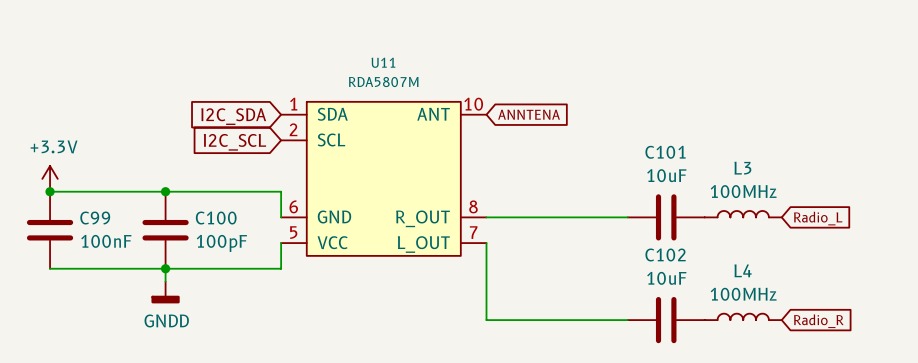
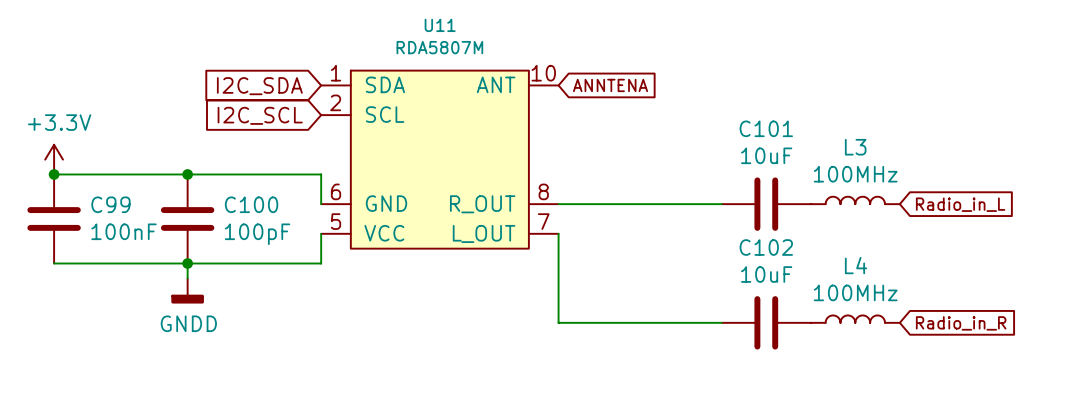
global label: Radio_L (818, 218) -> Radio_in_L (960, 204)
global label: Radio_R (818, 321) -> Radio_in_R (961, 323)

